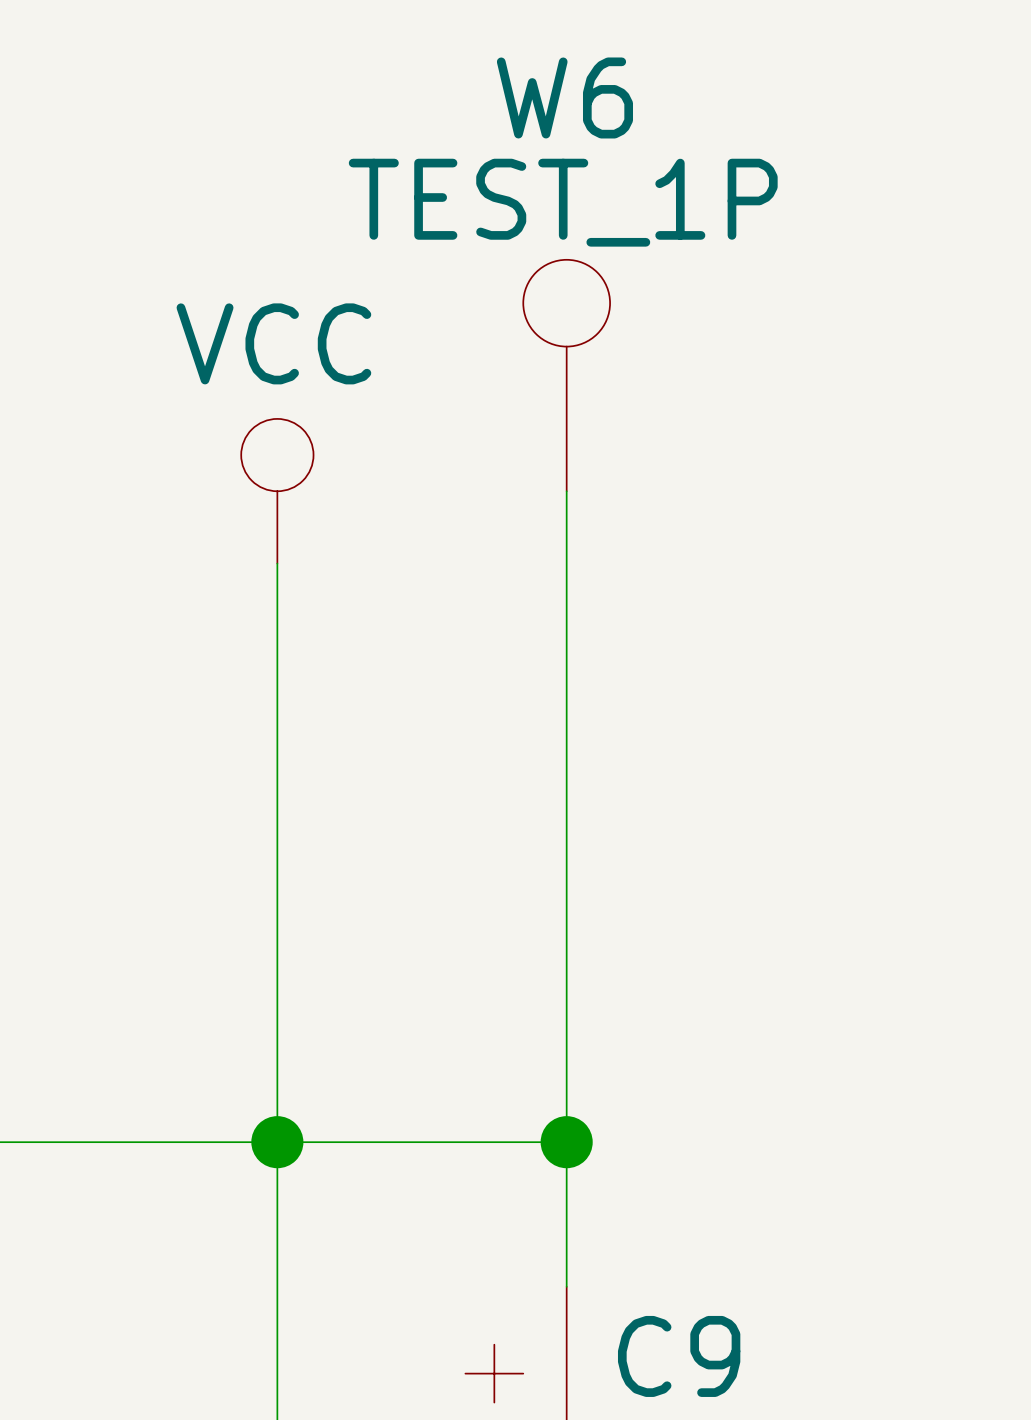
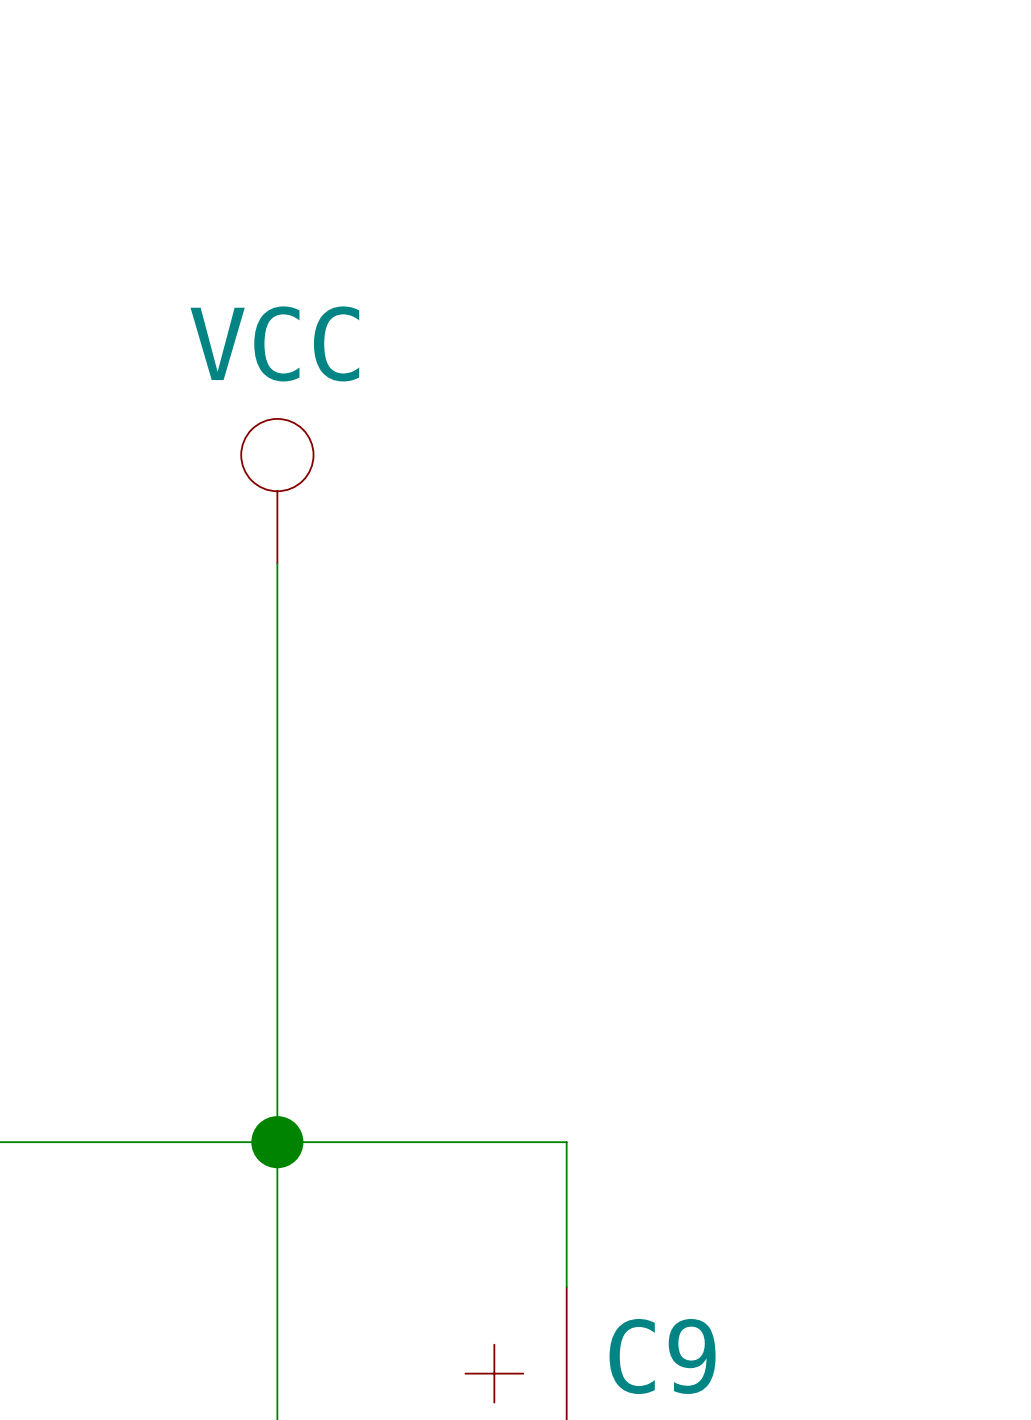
W6: TEST_1P (566, 375) -> none
wire: (566, 491) (566, 1142) -> none
junction: (566, 1142) -> none

